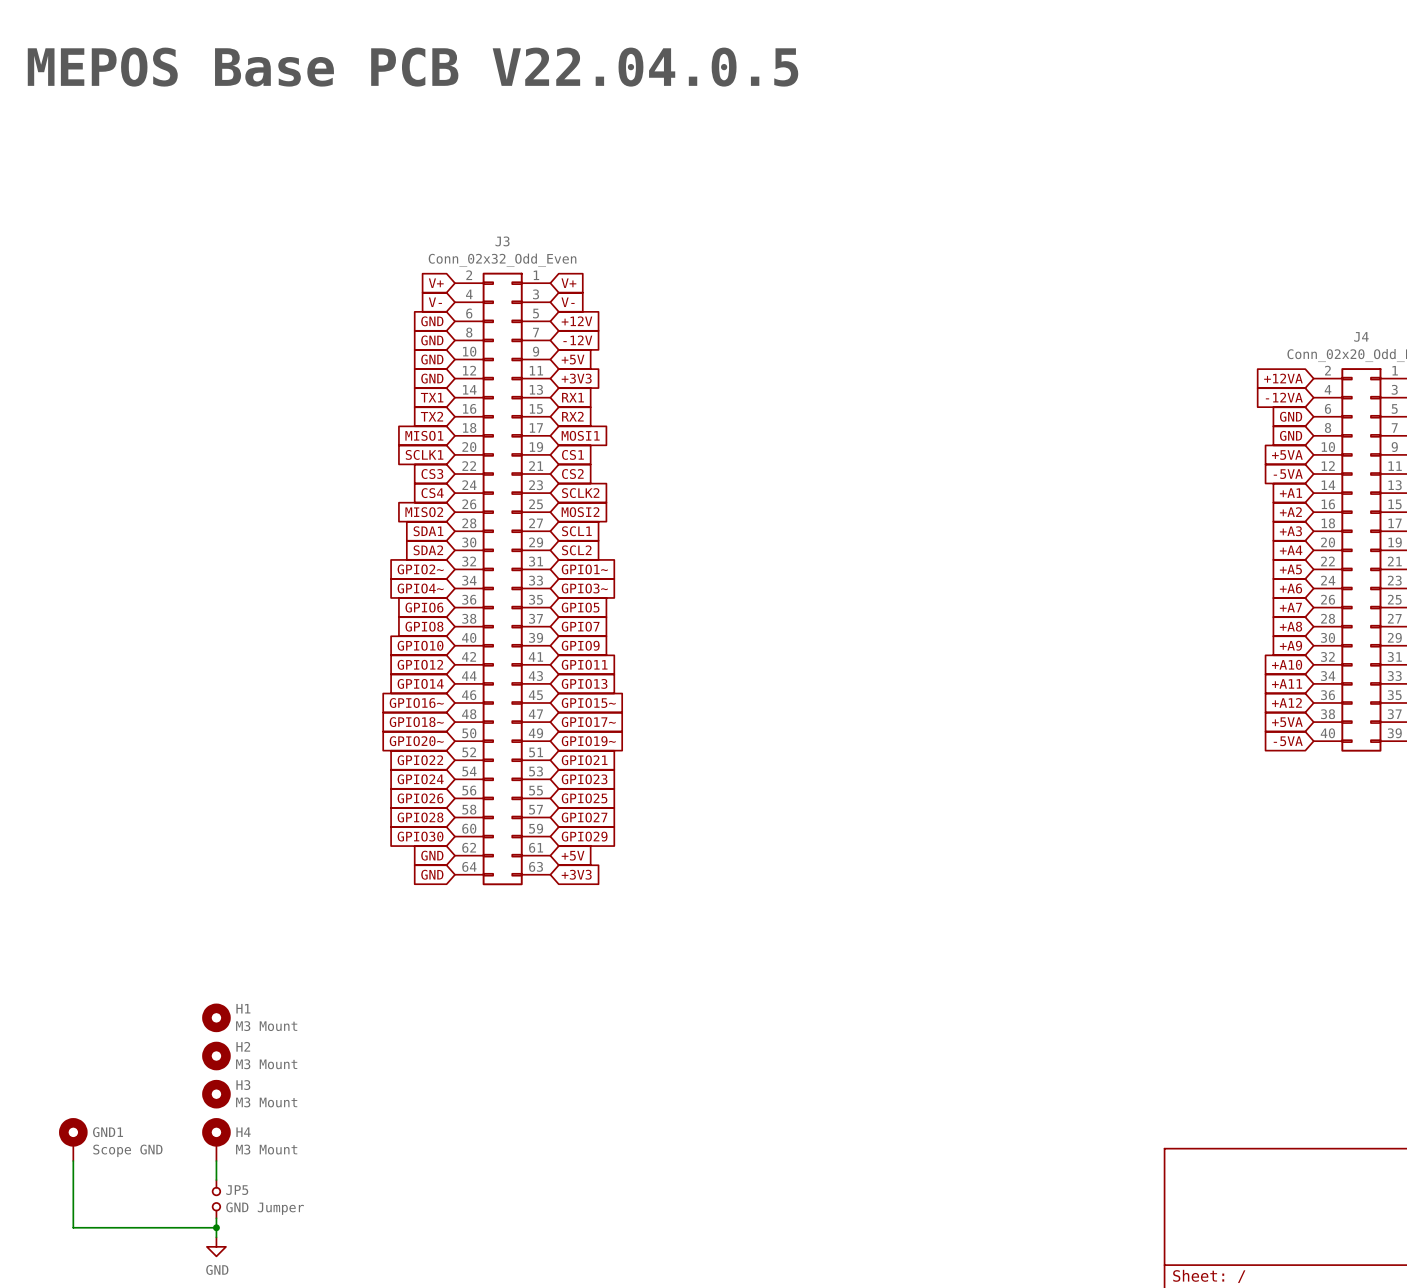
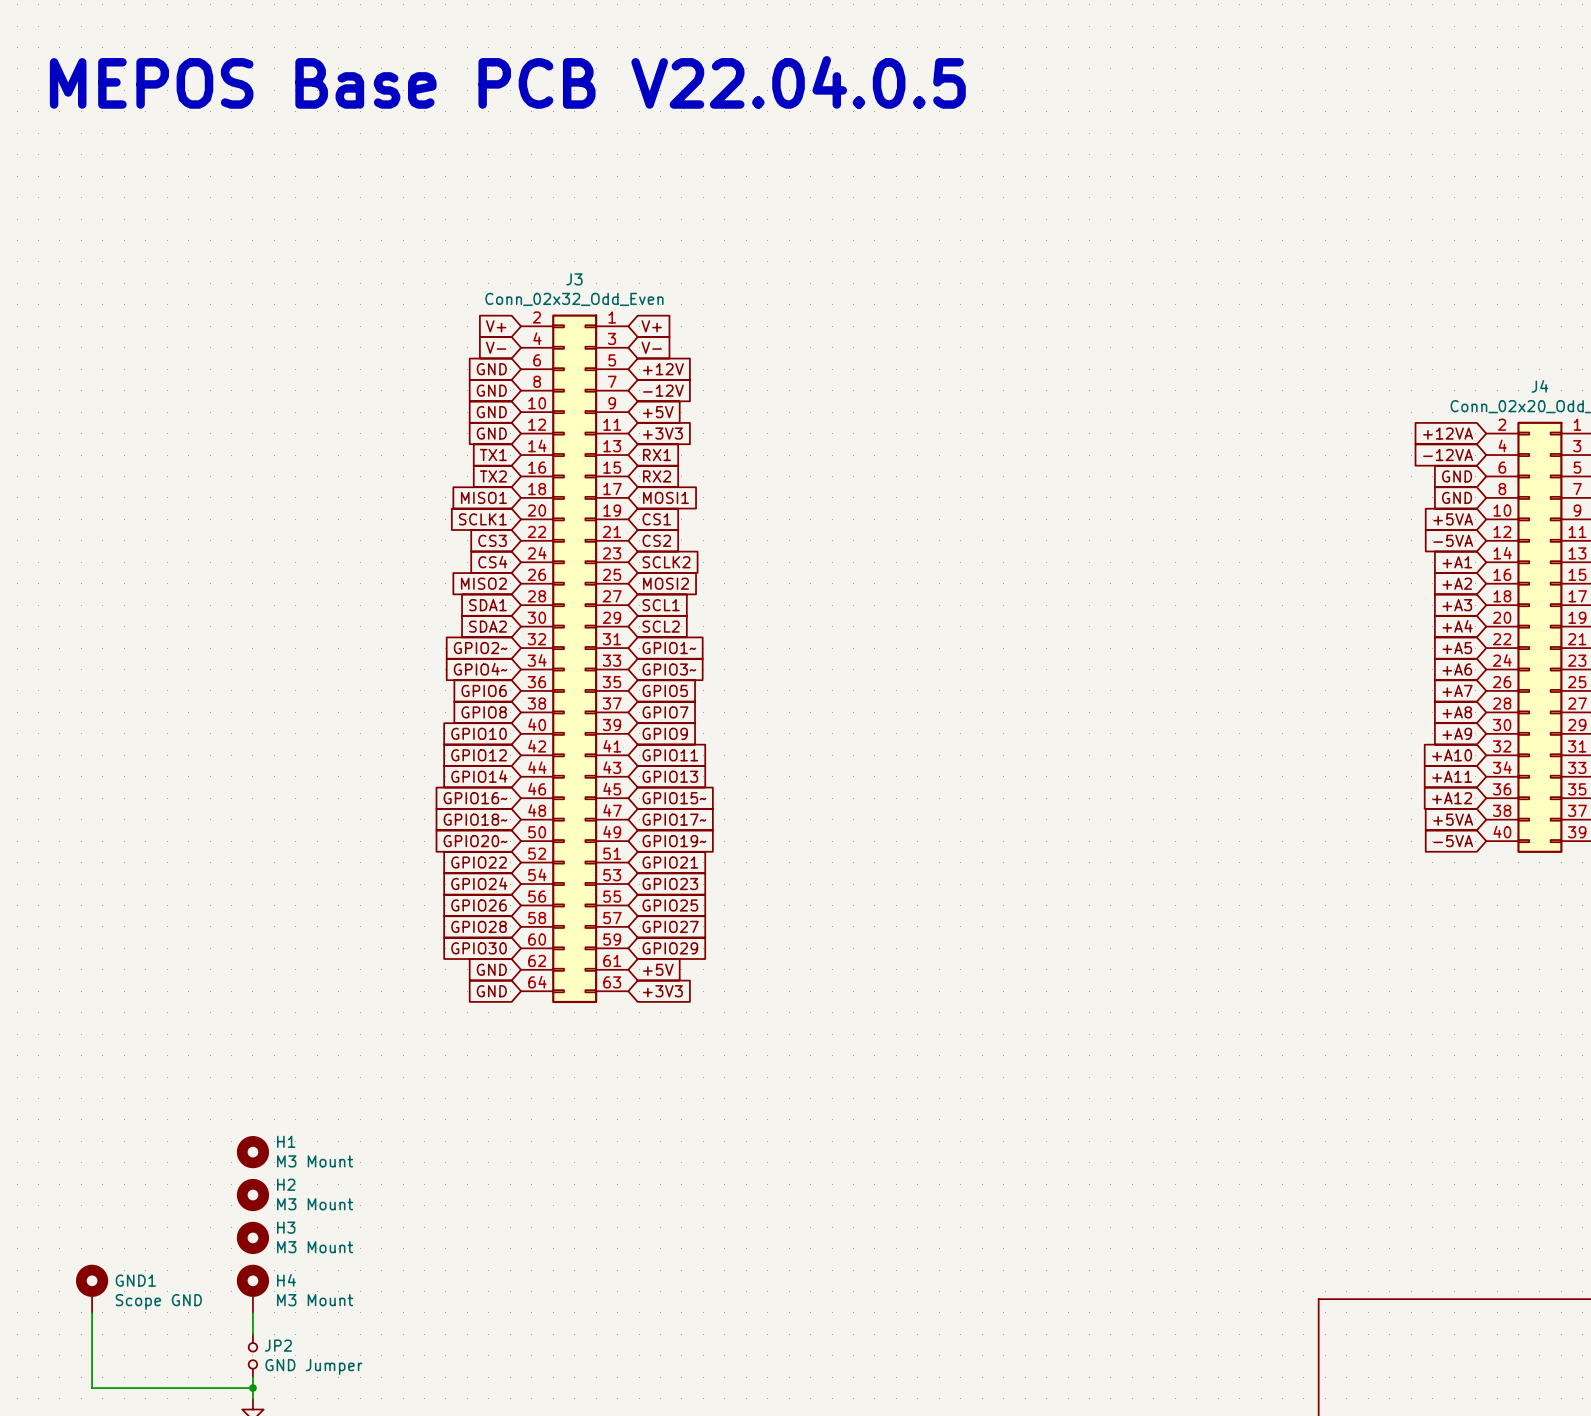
JP5 name: JP5 (237, 1190) -> JP2 (278, 1345)

